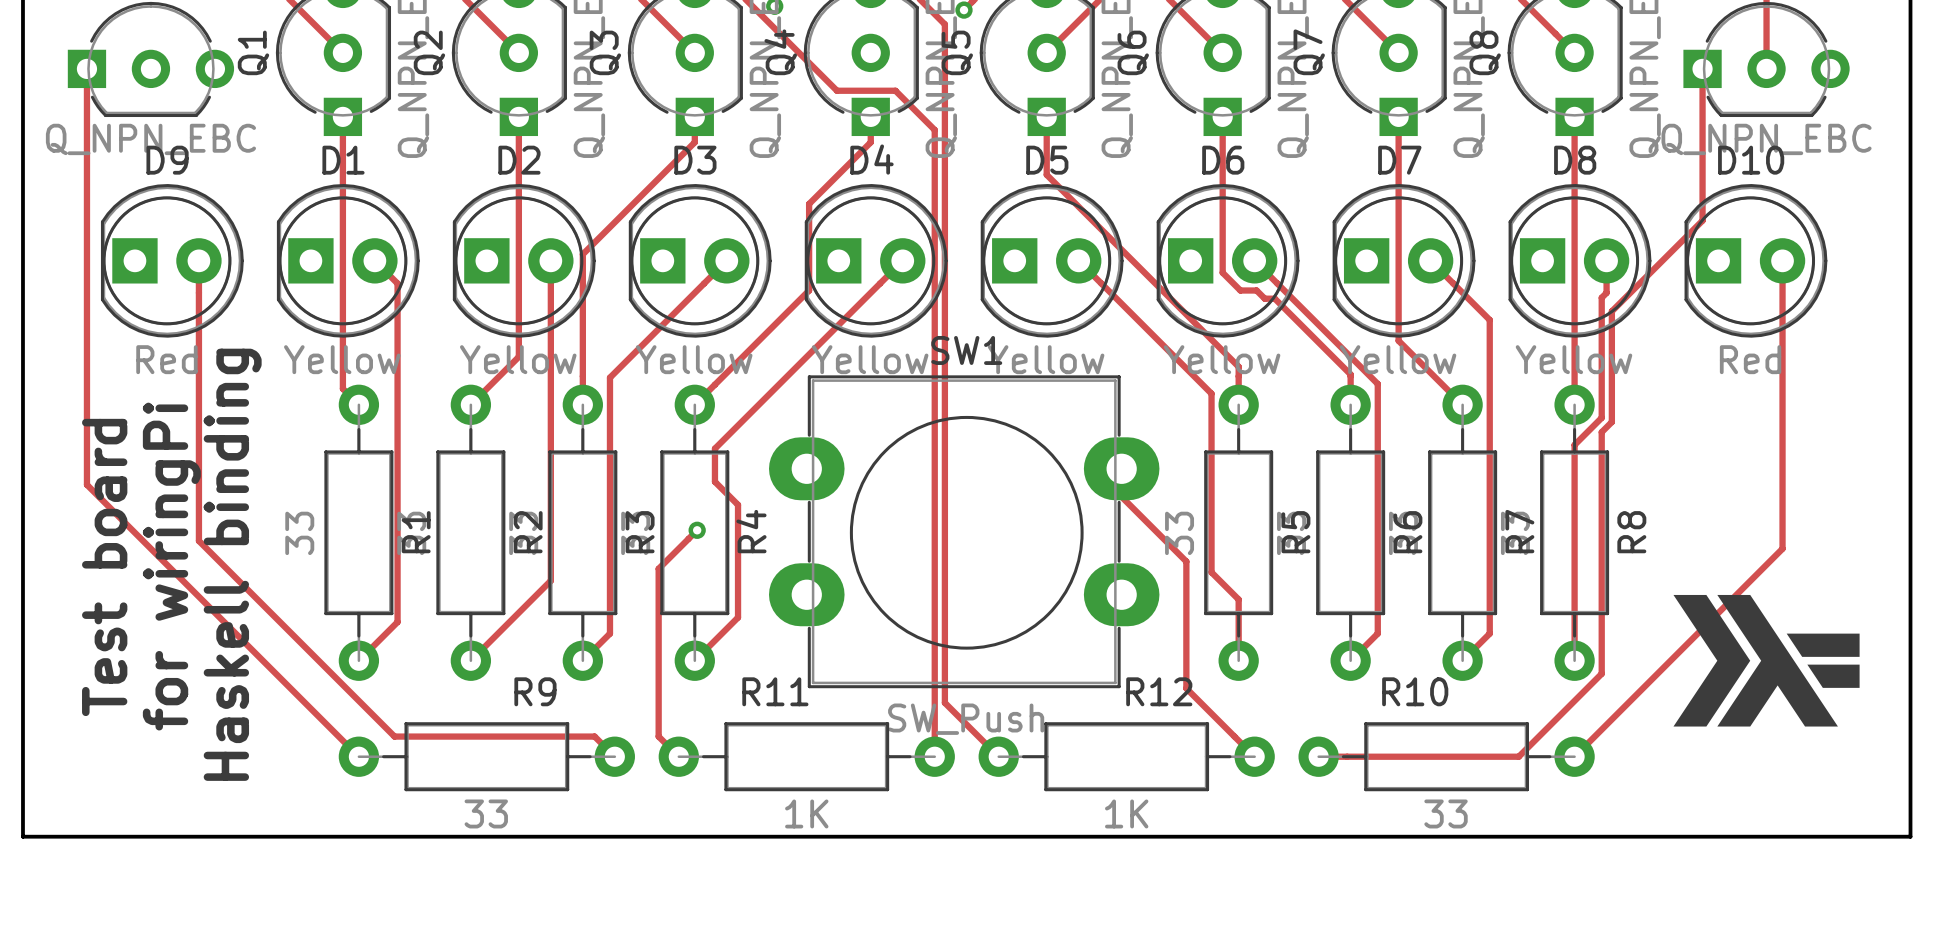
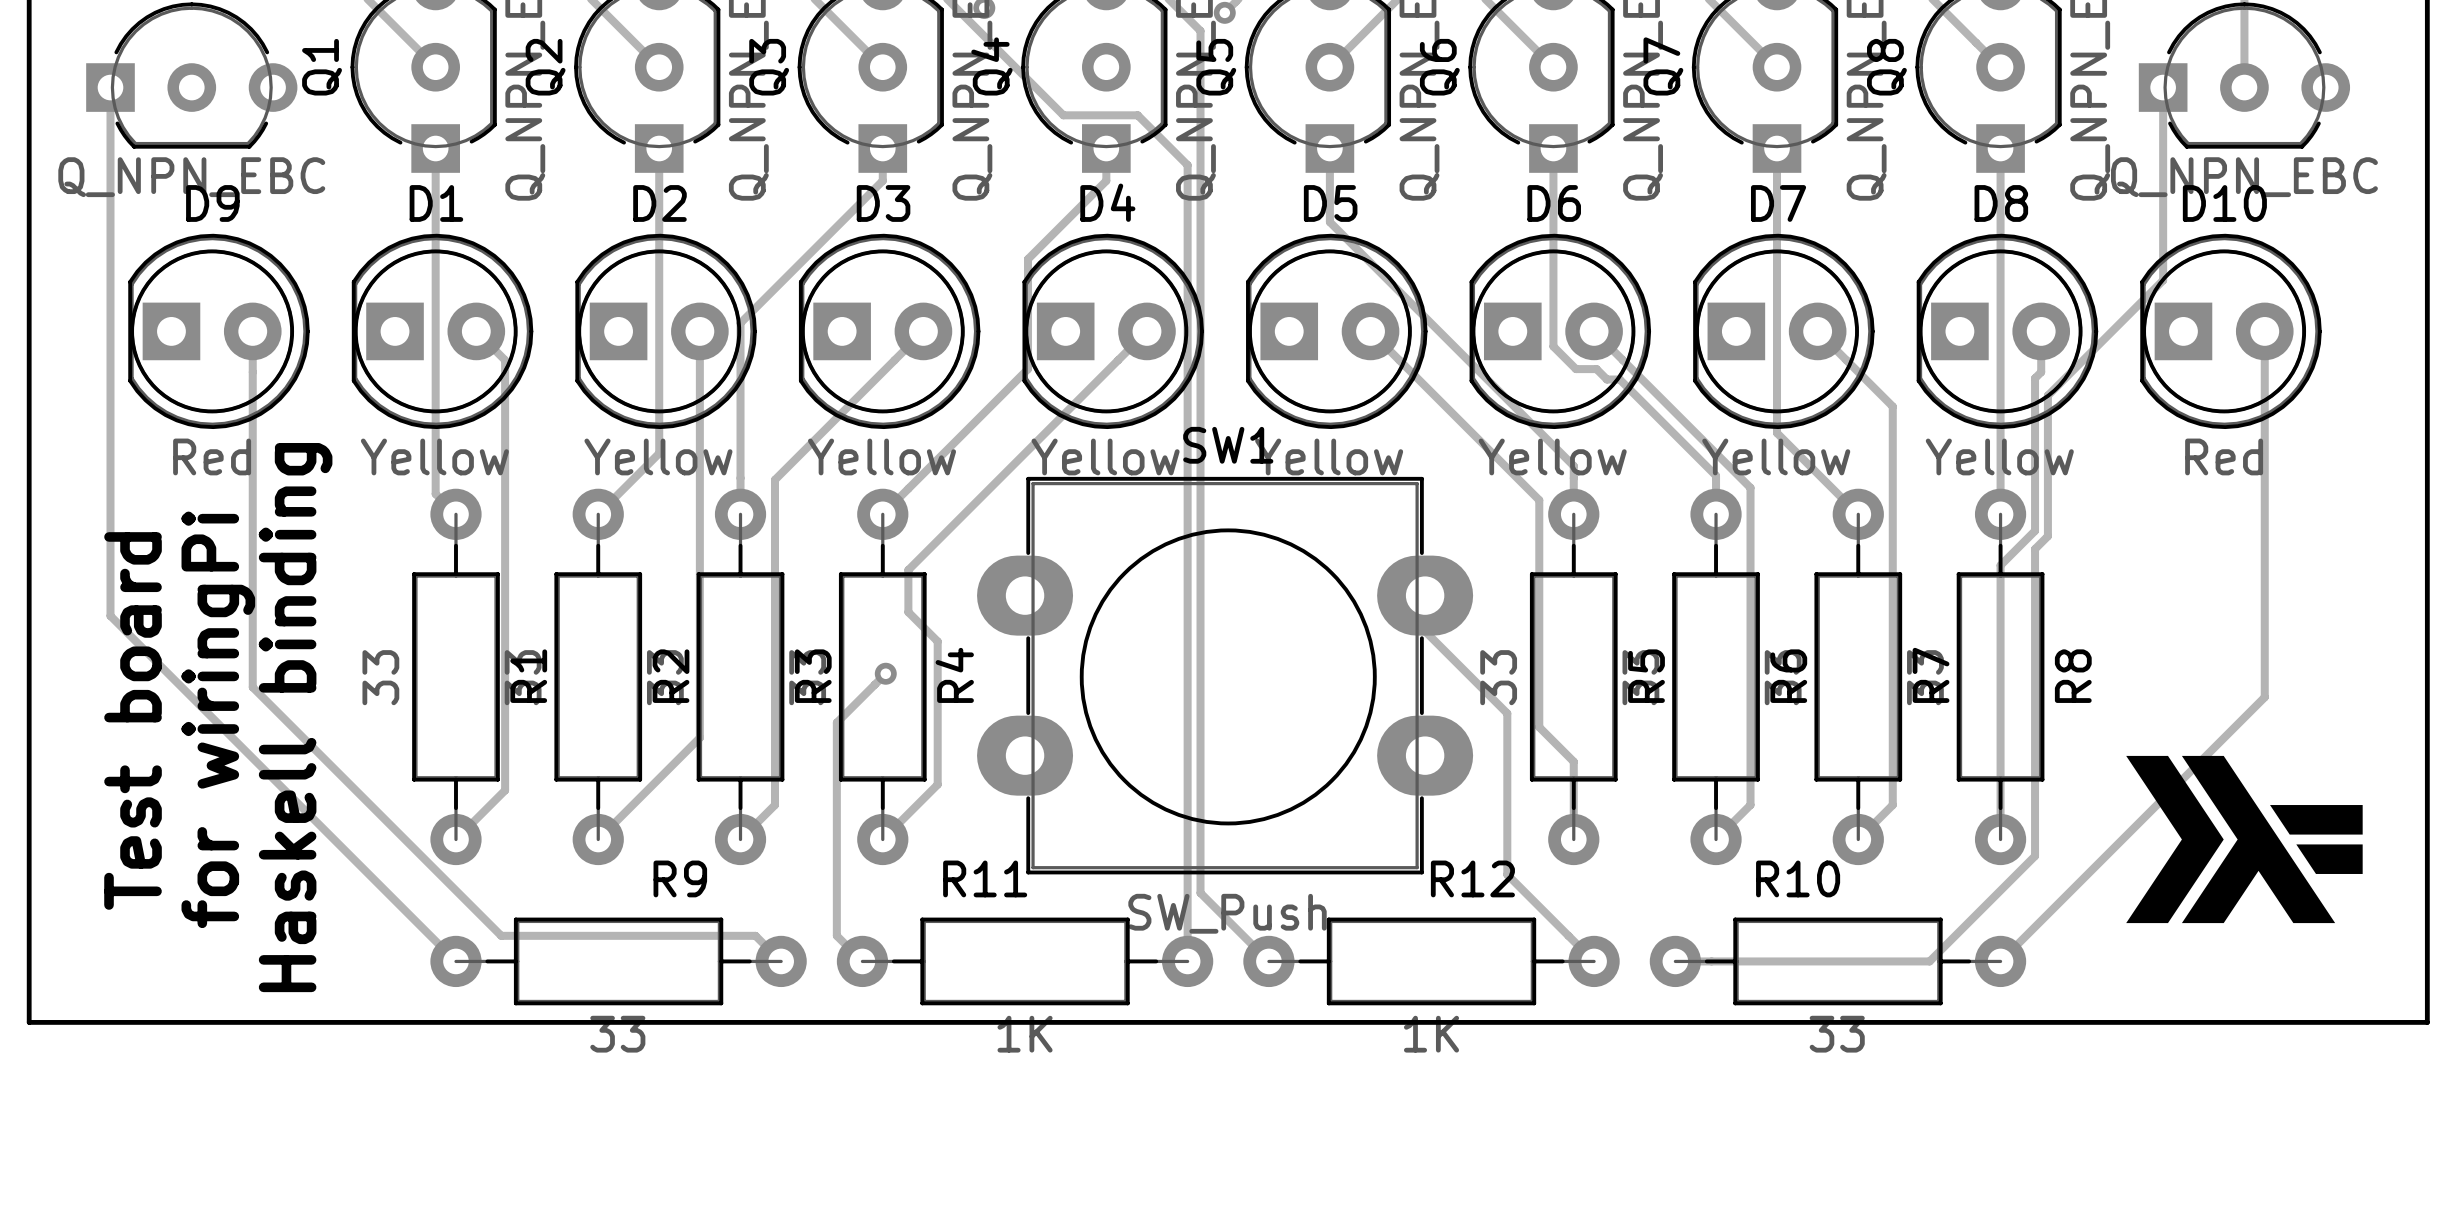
board edge: (22, 804) (22, 836) (1910, 836) (1910, 804) -> (29, 1022) (2427, 1022)

